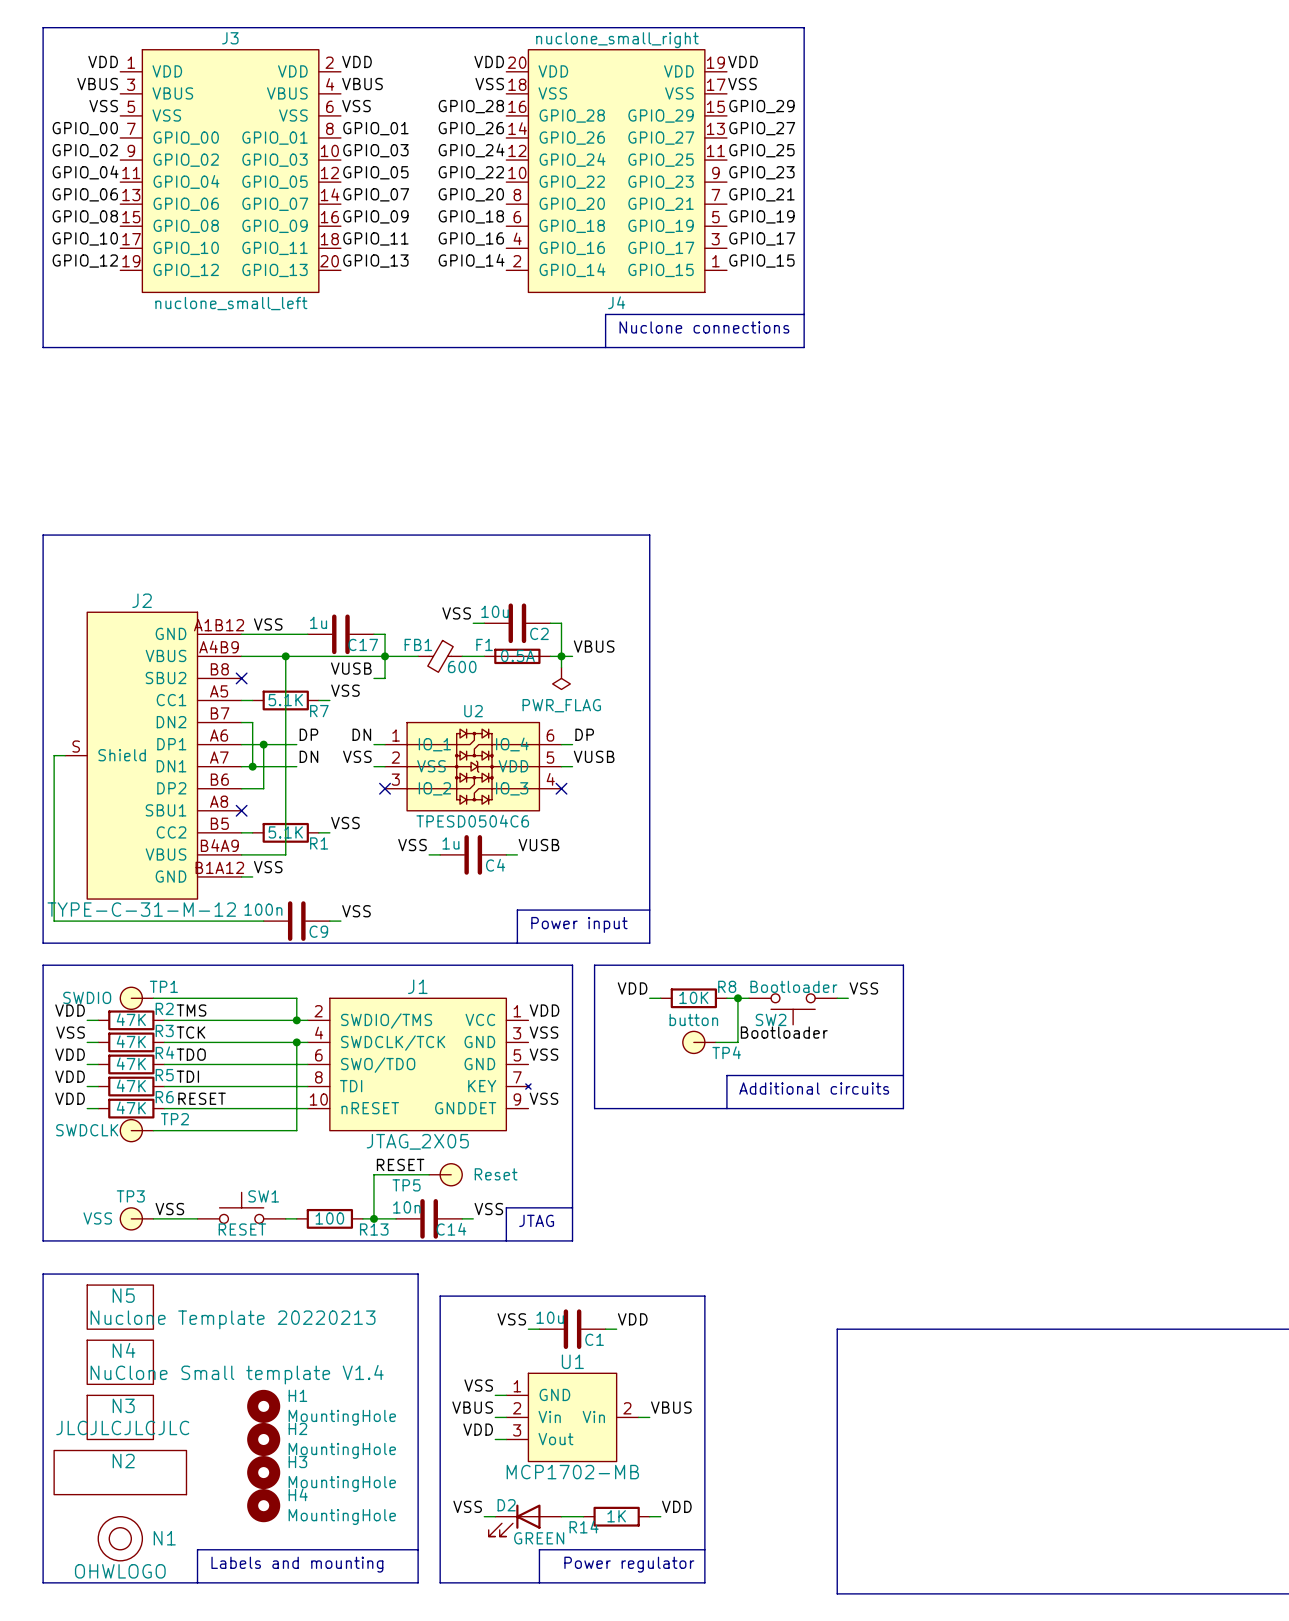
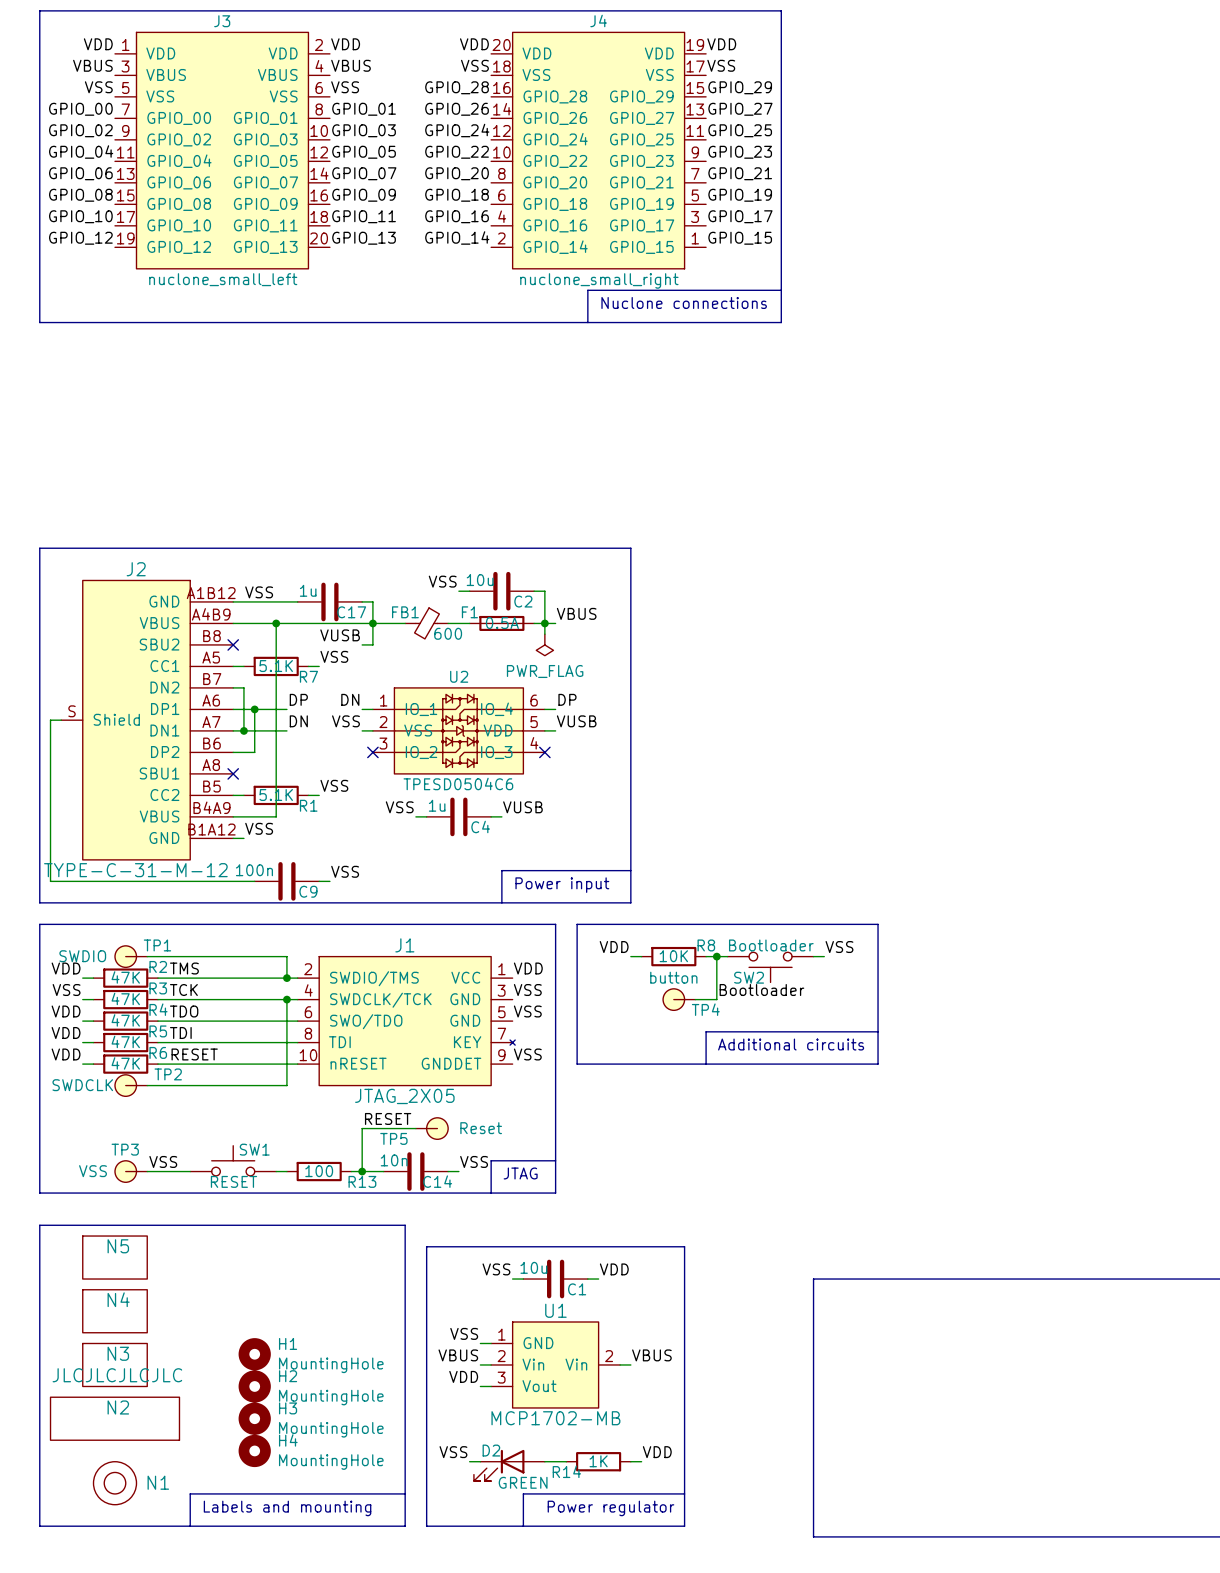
J4 value position: nuclone_small_right (617, 40) -> nuclone_small_right (599, 280)
J4 name position: J4 (616, 302) -> J4 (598, 20)
line: (43, 579) (43, 535) (649, 535) (649, 579) -> (39, 548) (630, 548)
N5 value: Nuclone Template 20220213 (233, 1319) -> none
N4 value: NuClone Small template V1.4 (237, 1374) -> none
N1 value: OHWLOGO (120, 1571) -> none

